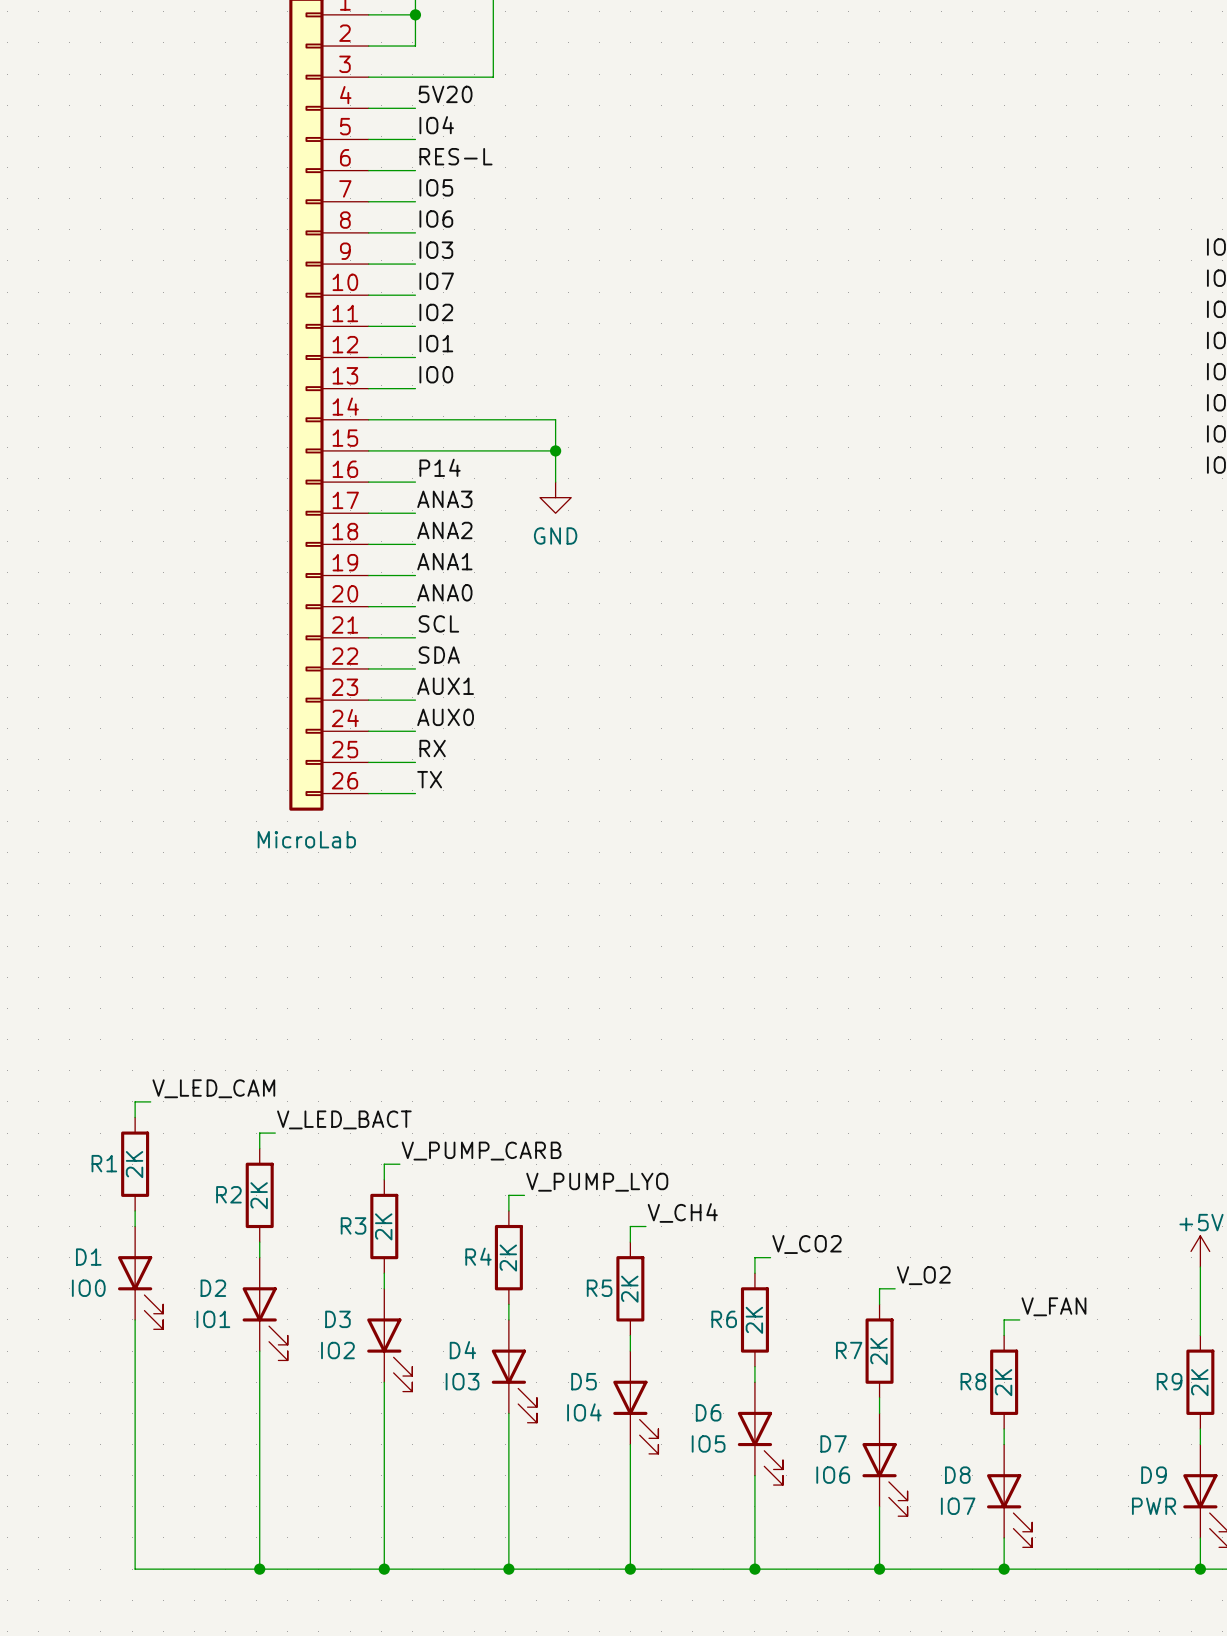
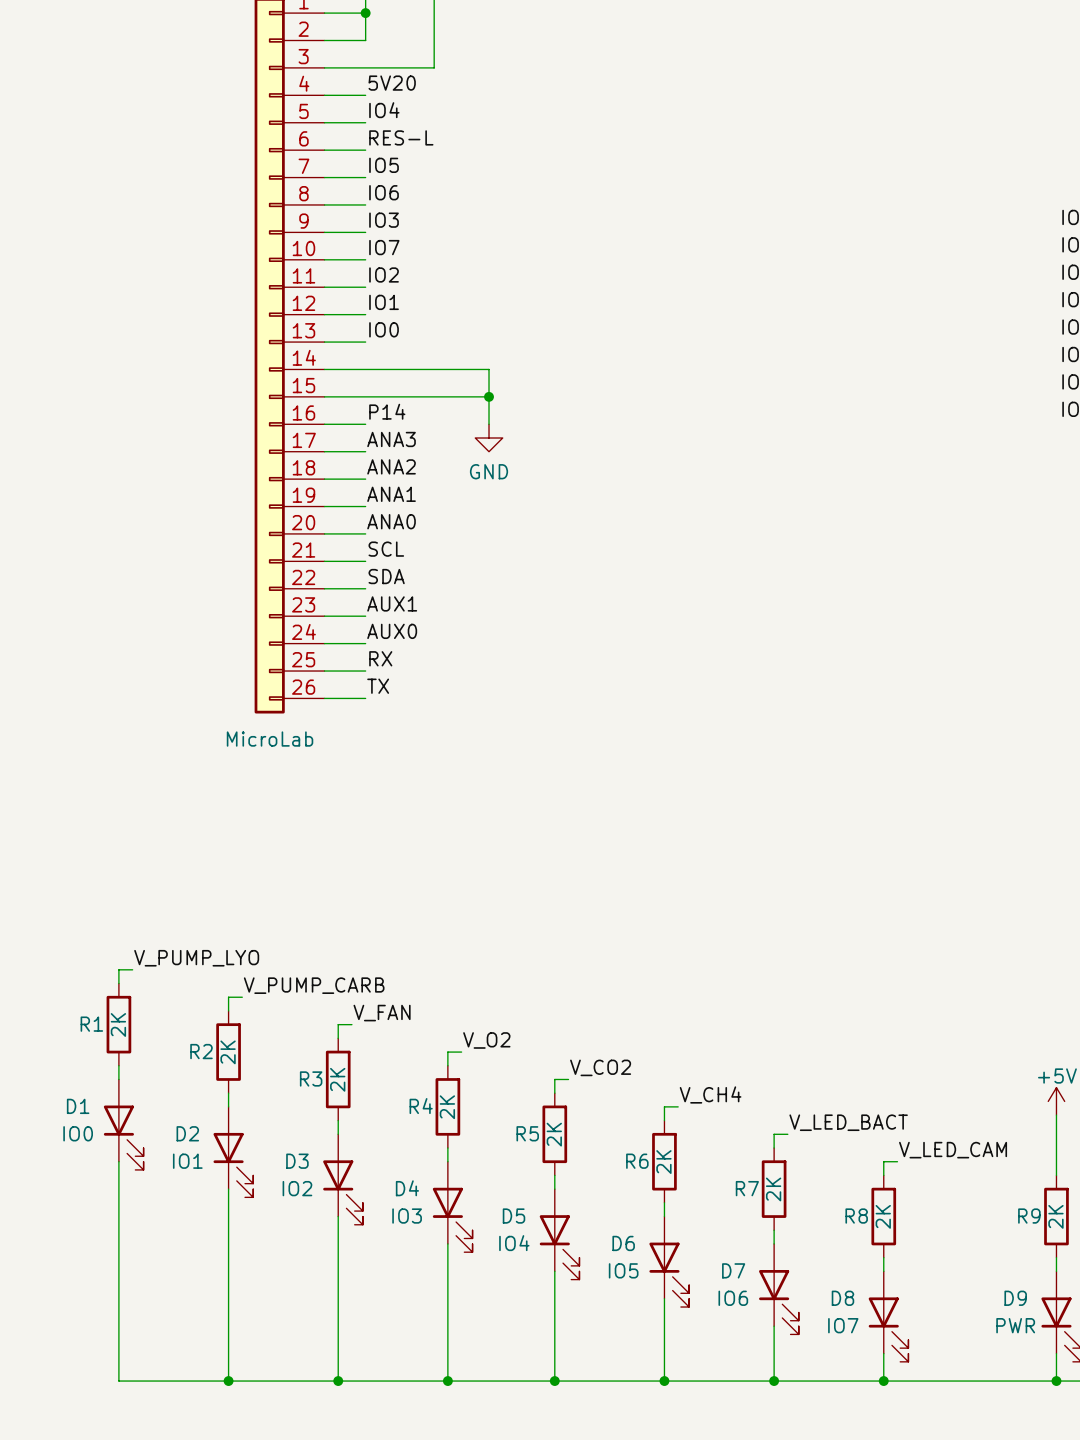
label: V_LED_CAM (213, 1088) -> V_PUMP_LYO (196, 958)
label: V_LED_BACT (344, 1119) -> V_PUMP_CARB (314, 985)
label: V_PUMP_CARB (481, 1151) -> V_FAN (382, 1013)
label: V_PUMP_LYO (597, 1182) -> V_O2 (486, 1040)
label: V_CH4 (682, 1212) -> V_CO2 (600, 1067)
label: V_CO2 (806, 1244) -> V_CH4 (710, 1094)
label: V_O2 (923, 1275) -> V_LED_BACT (848, 1122)
label: V_FAN (1053, 1306) -> V_LED_CAM (953, 1150)

